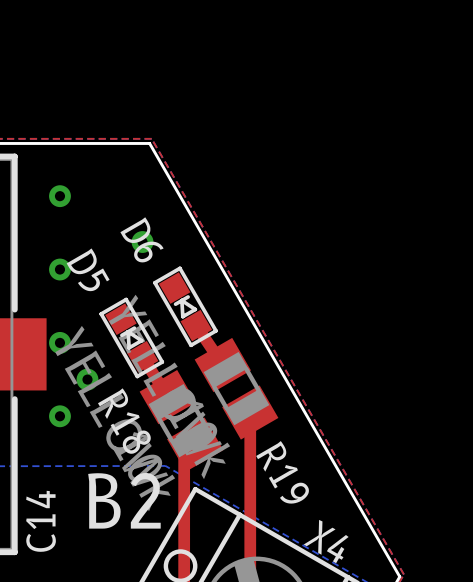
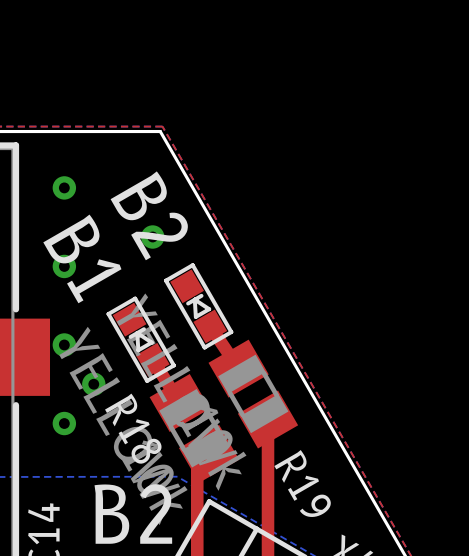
D6 name: D6 (141, 239) -> B2 (149, 215)
D5 name: D5 (88, 269) -> B1 (82, 258)

